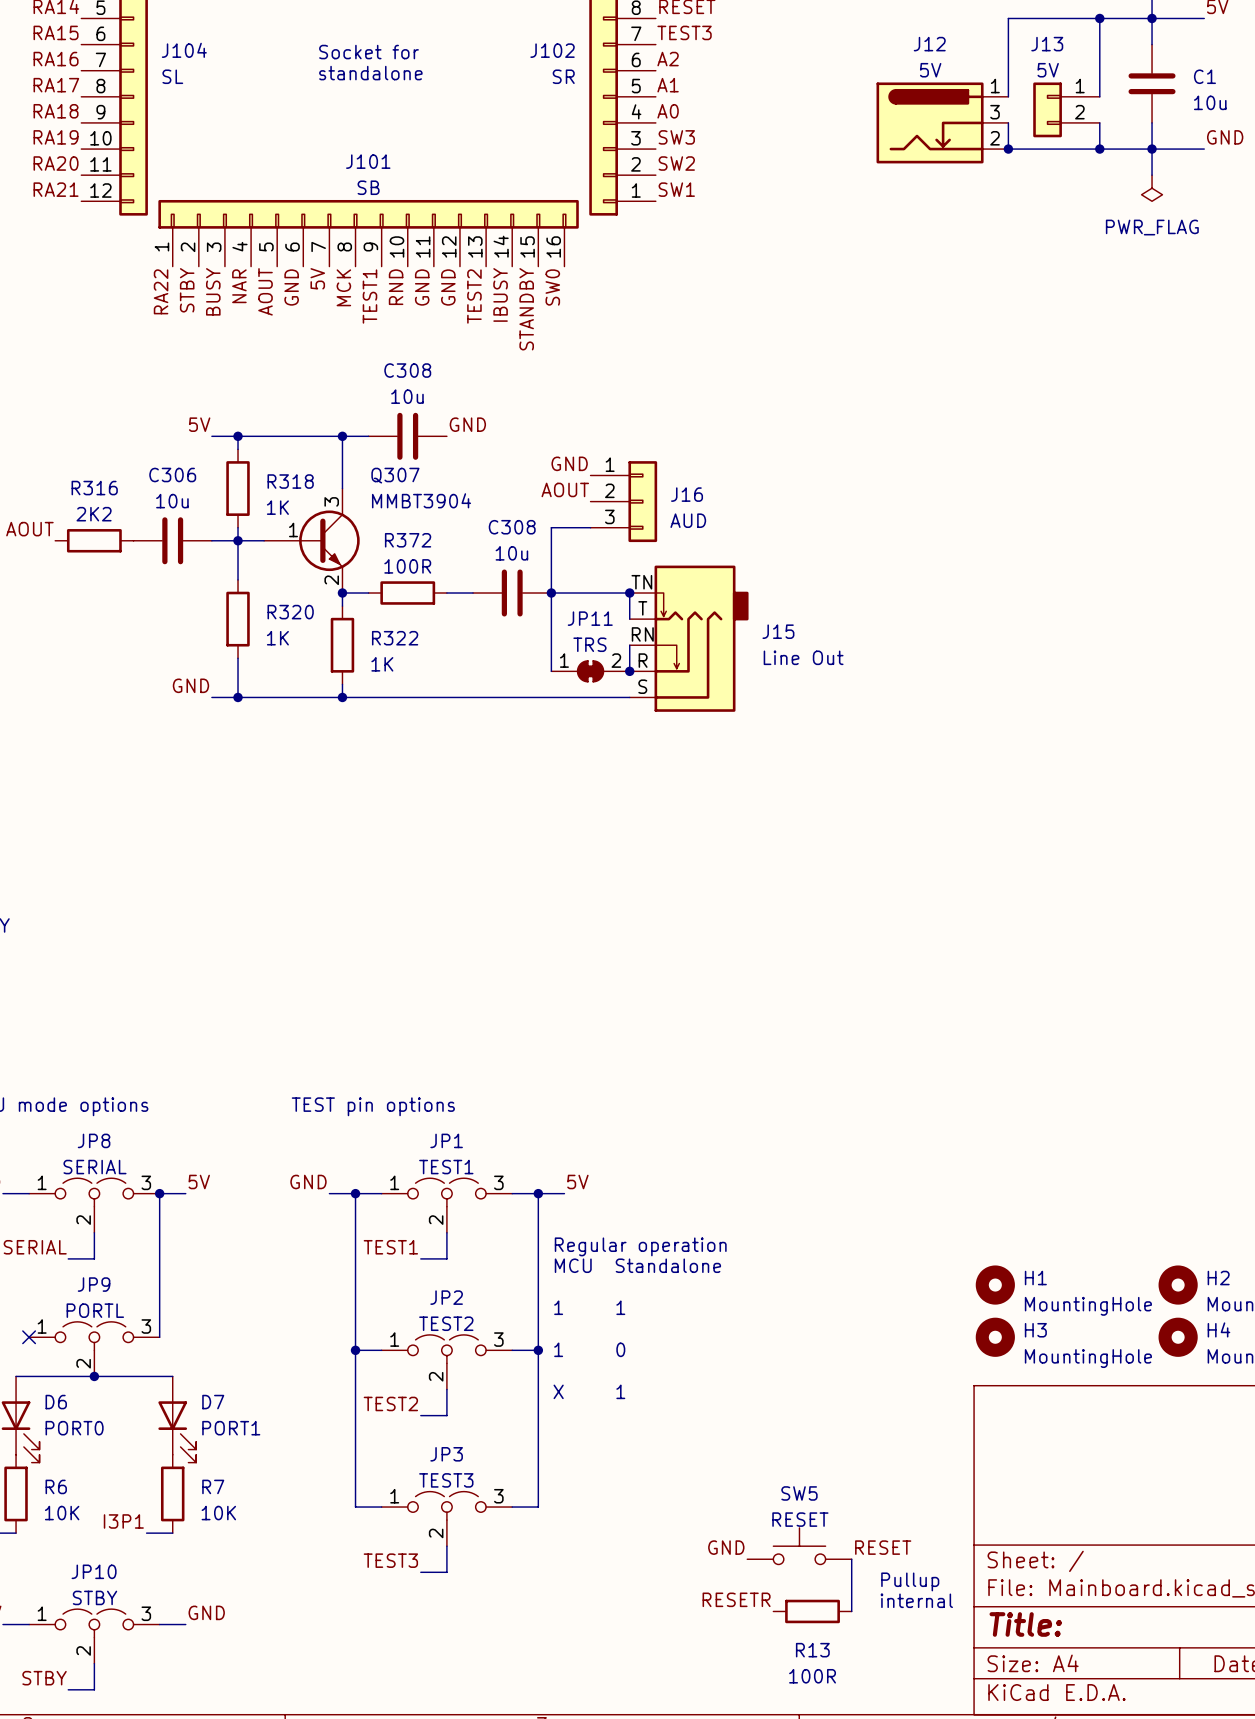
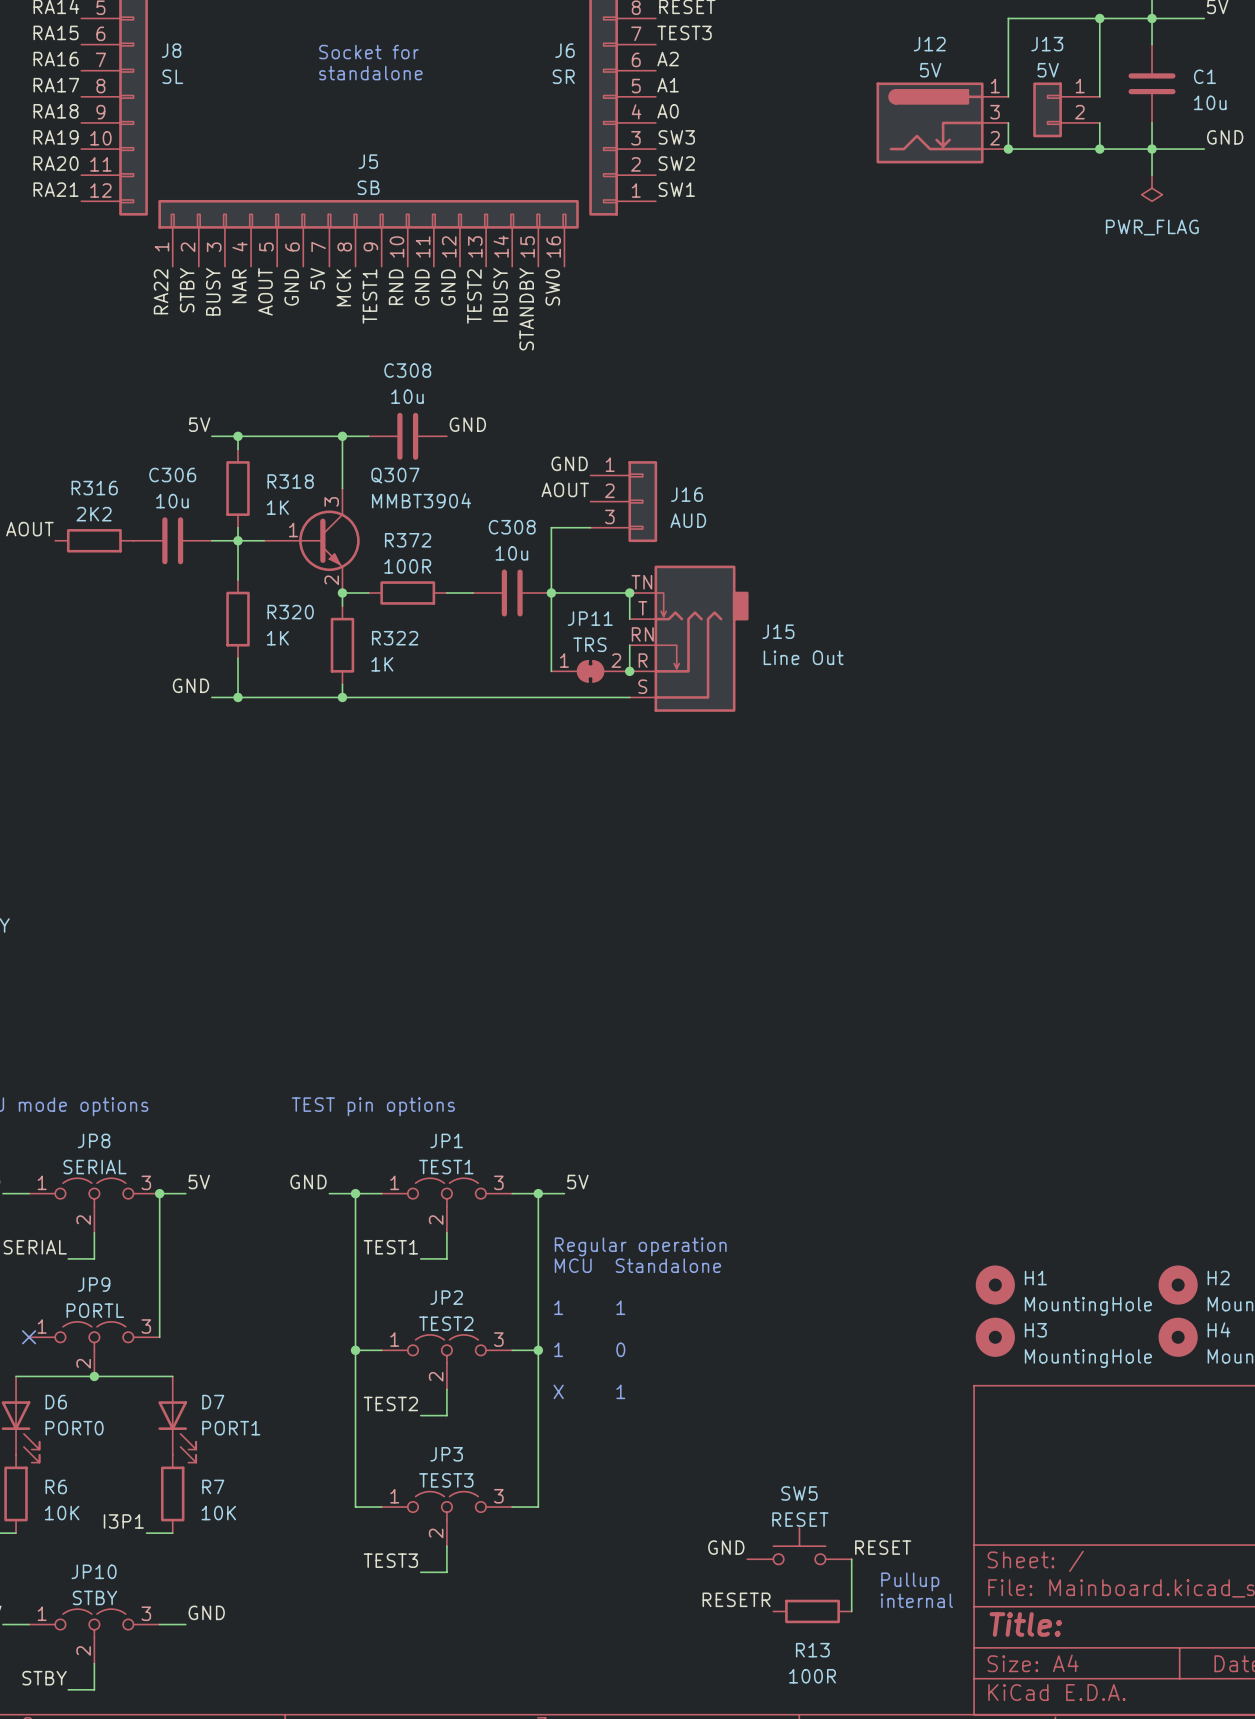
J104 name: J104 (184, 50) -> J8 (171, 50)
J102 name: J102 (552, 50) -> J6 (564, 50)
J101 name: J101 (368, 161) -> J5 (368, 161)

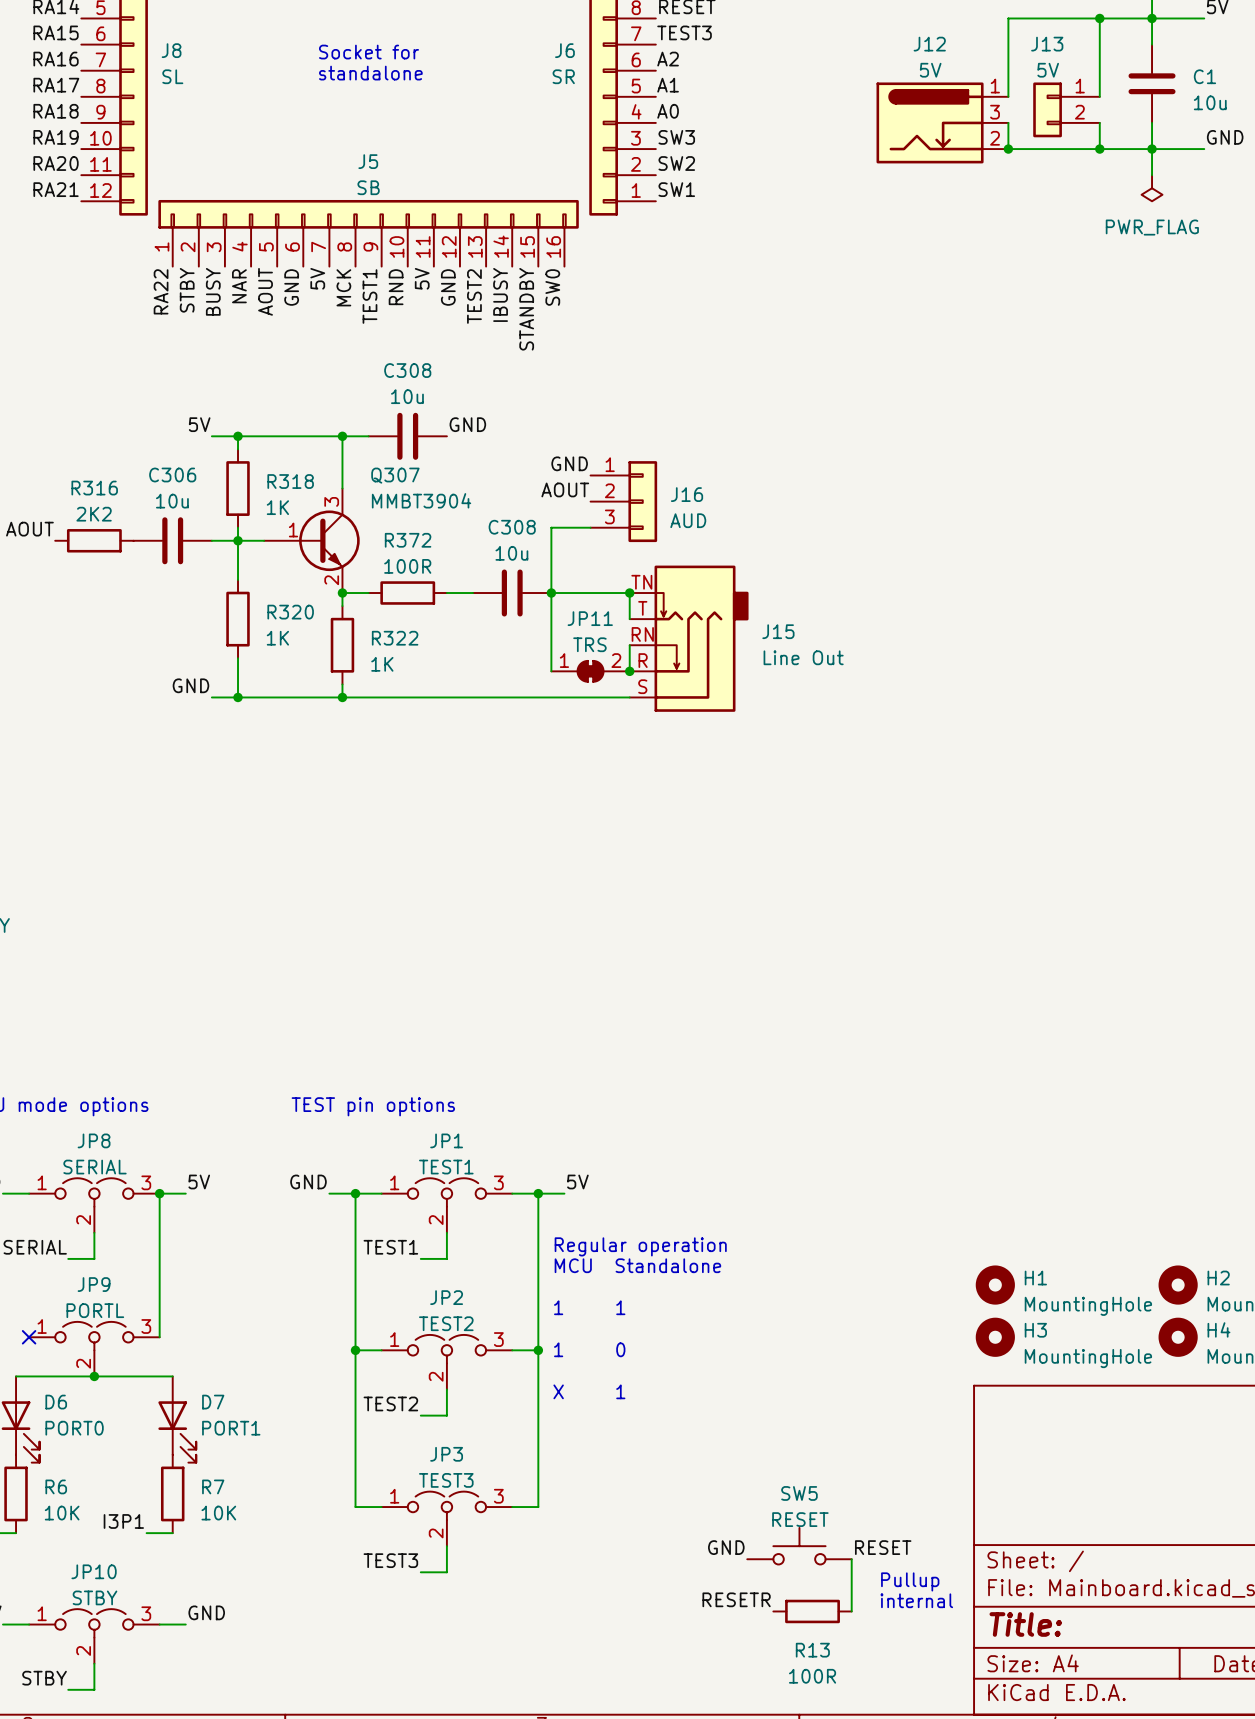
label: GND (422, 287) -> 5V (422, 278)

